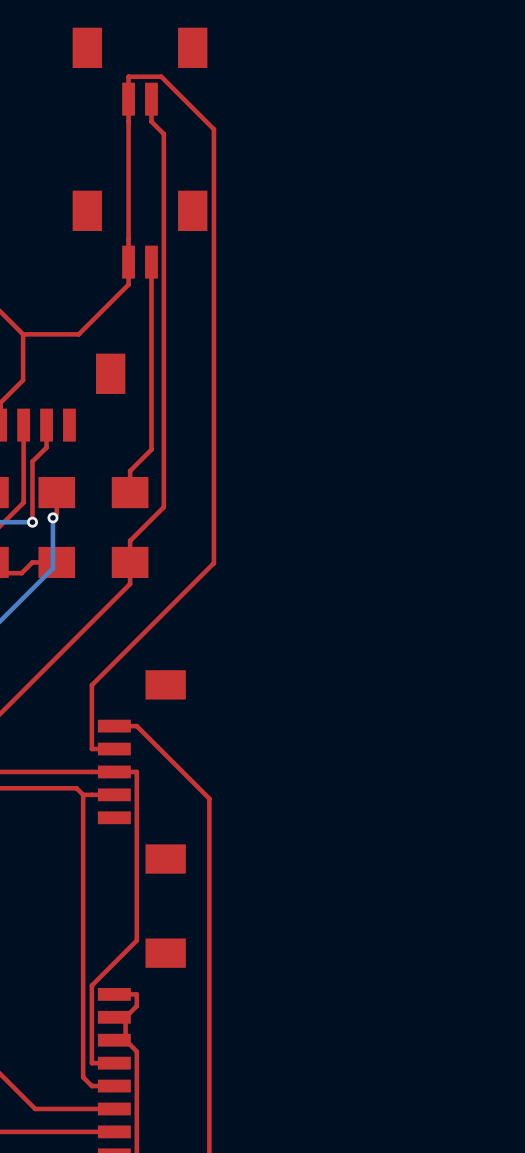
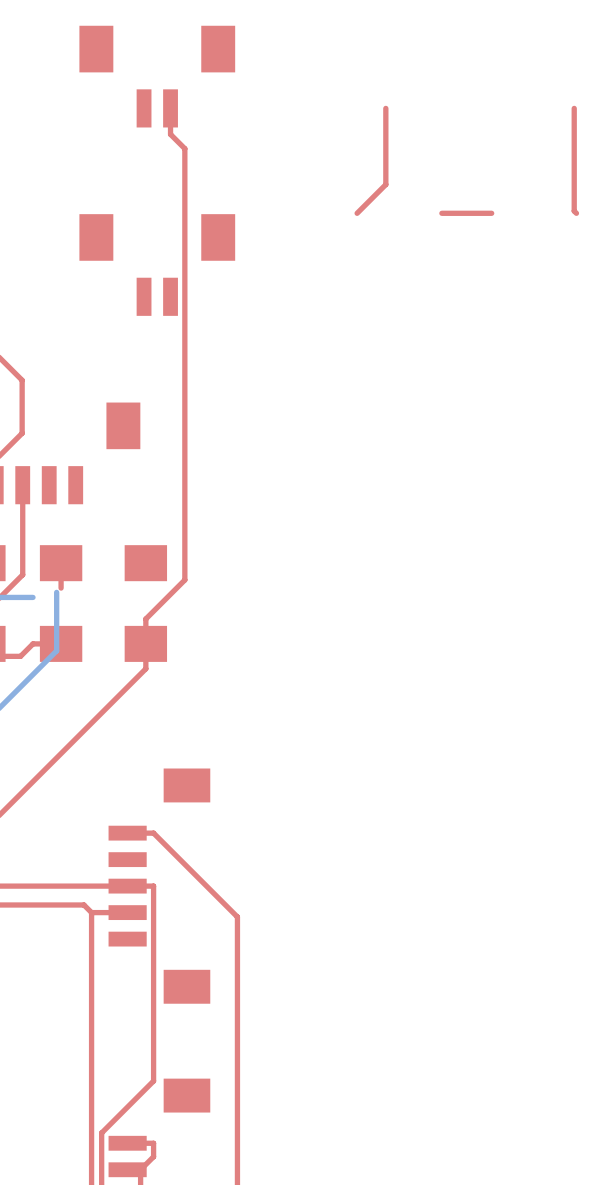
top track: none -> (385, 108) (385, 184) (357, 213)
top track: none -> (574, 108) (574, 211) (576, 213)
top track: none -> (491, 213) (441, 213)
top track: (151, 262) (151, 449) (130, 471) (130, 492) -> none
top track: (23, 334) (78, 334) (128, 284) (128, 76) (161, 76) (213, 129) (213, 563) (91, 685) (91, 749) (114, 749) -> none
top track: (46, 425) (46, 447) (32, 461) (32, 522) -> none
via: (52, 517) -> none
via: (32, 522) -> none

